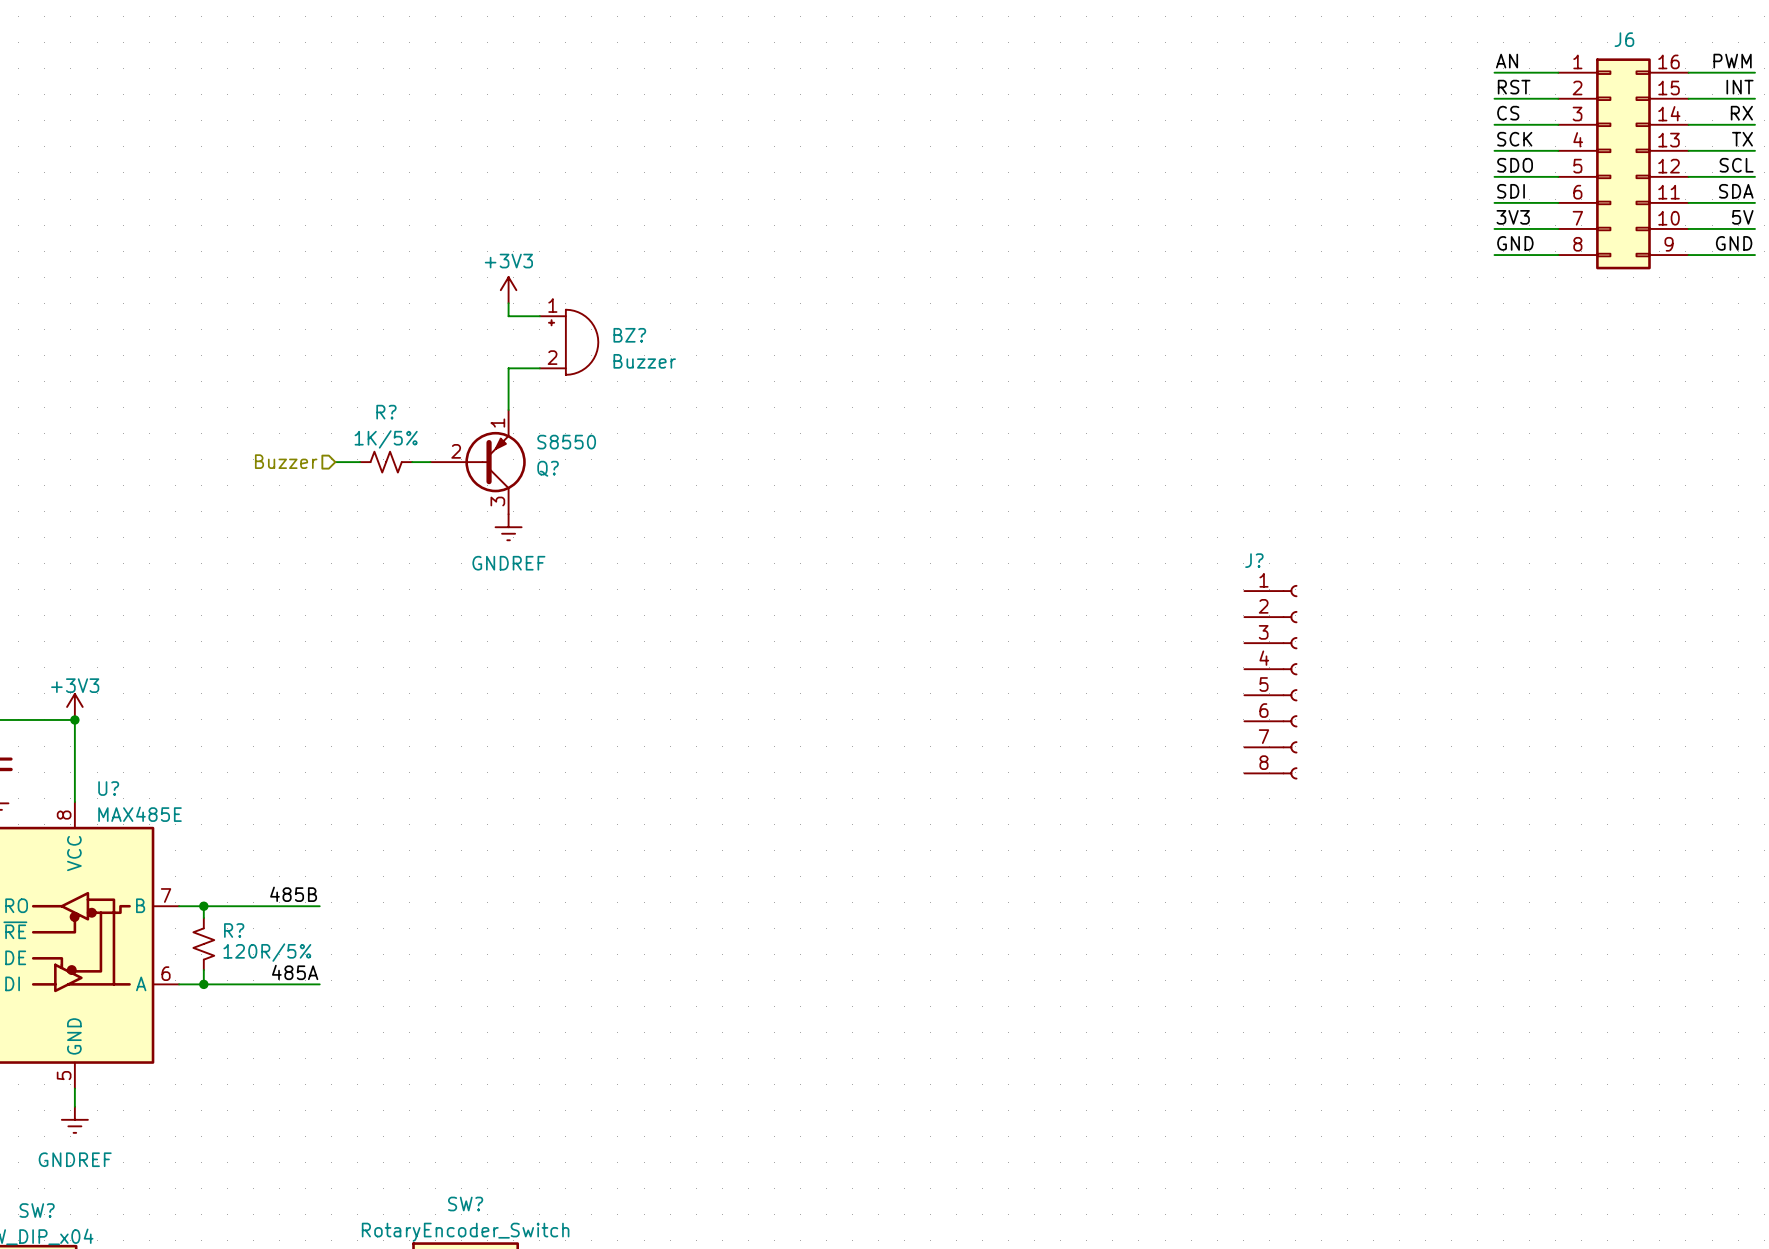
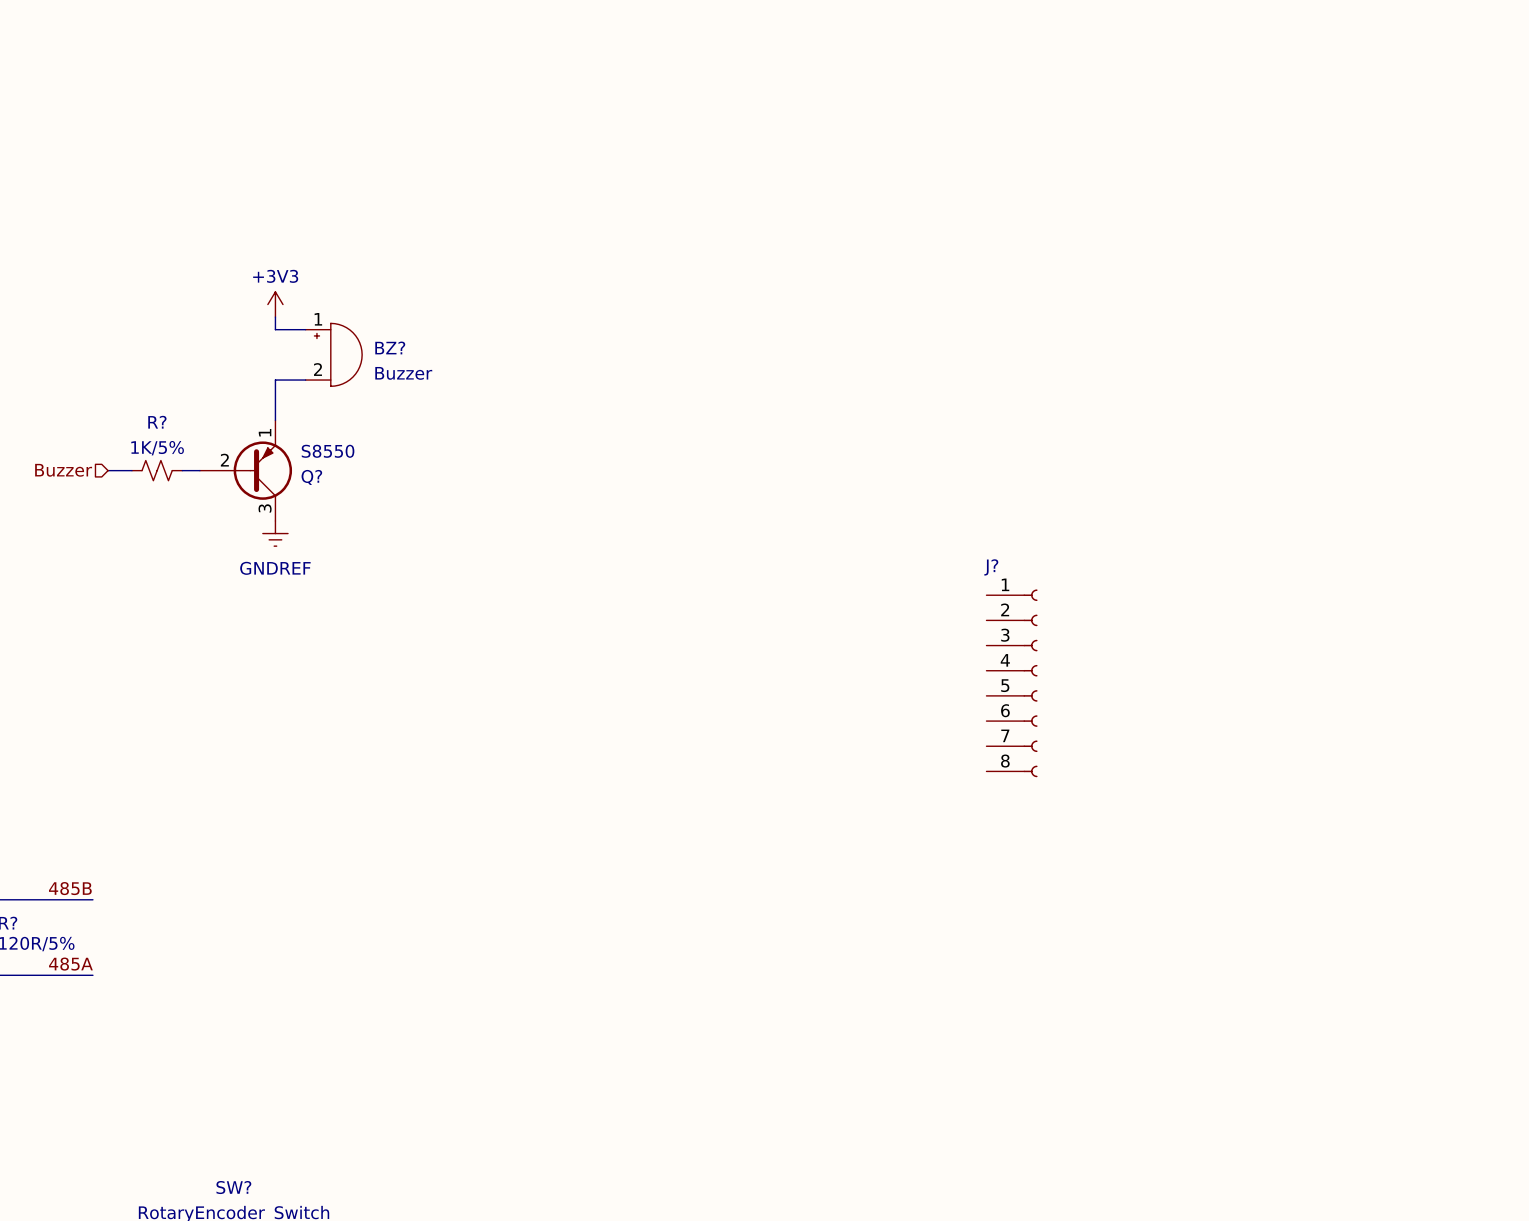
label: AN (1507, 61) -> none
label: PWM (1732, 61) -> none
wire: (1494, 72) (1558, 72) -> none
wire: (1688, 72) (1754, 72) -> none
label: RST (1514, 87) -> none
label: INT (1740, 87) -> none
wire: (1494, 98) (1558, 98) -> none
wire: (1688, 98) (1754, 98) -> none
label: CS (1508, 113) -> none
label: RX (1741, 113) -> none
wire: (1494, 124) (1558, 124) -> none
wire: (1688, 124) (1754, 124) -> none
label: SCK (1514, 139) -> none
label: TX (1742, 139) -> none
wire: (1494, 150) (1558, 150) -> none
wire: (1688, 150) (1754, 150) -> none
J6: (1623, 163) -> none
label: SDO (1515, 165) -> none
label: SCL (1736, 165) -> none
wire: (1494, 176) (1558, 176) -> none
wire: (1688, 176) (1754, 176) -> none
label: SDI (1511, 191) -> none
label: SDA (1736, 191) -> none
wire: (1494, 202) (1558, 202) -> none
wire: (1688, 202) (1754, 202) -> none
label: 3V3 (1513, 217) -> none
label: 5V (1742, 217) -> none
wire: (1494, 228) (1558, 228) -> none
wire: (1688, 228) (1754, 228) -> none
label: GND (1515, 243) -> none
label: GND (1734, 243) -> none
wire: (1494, 255) (1558, 255) -> none
wire: (1688, 255) (1754, 255) -> none

